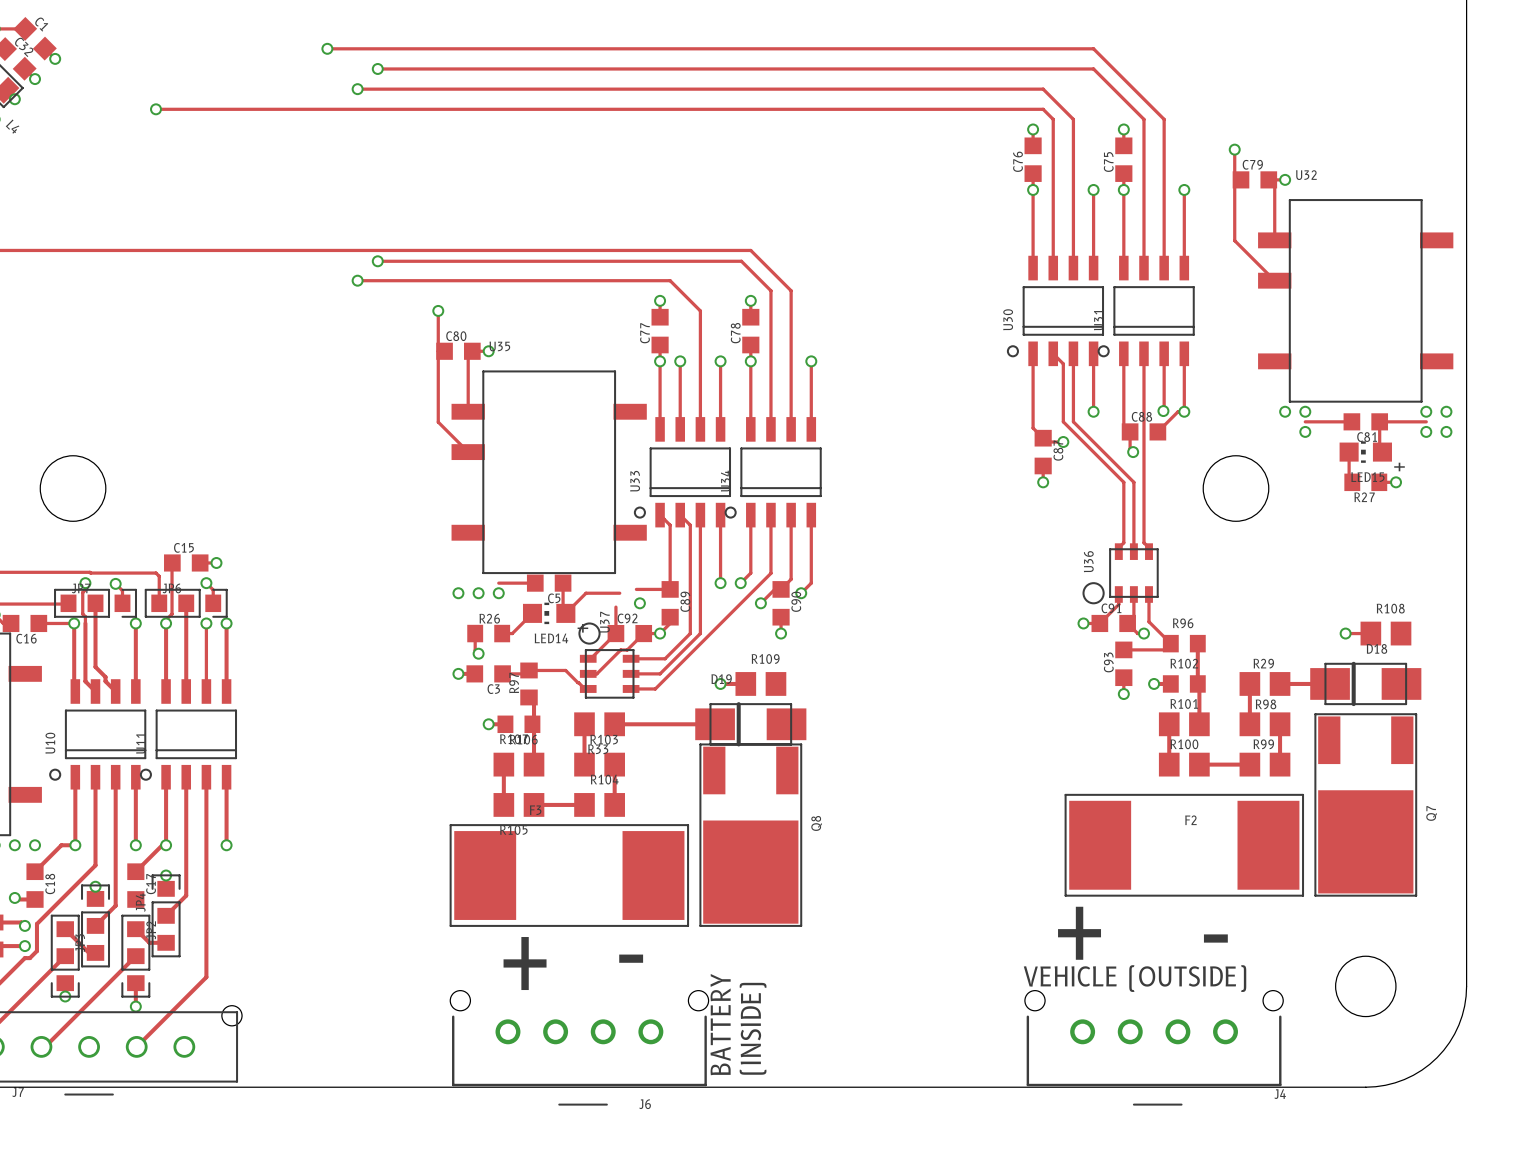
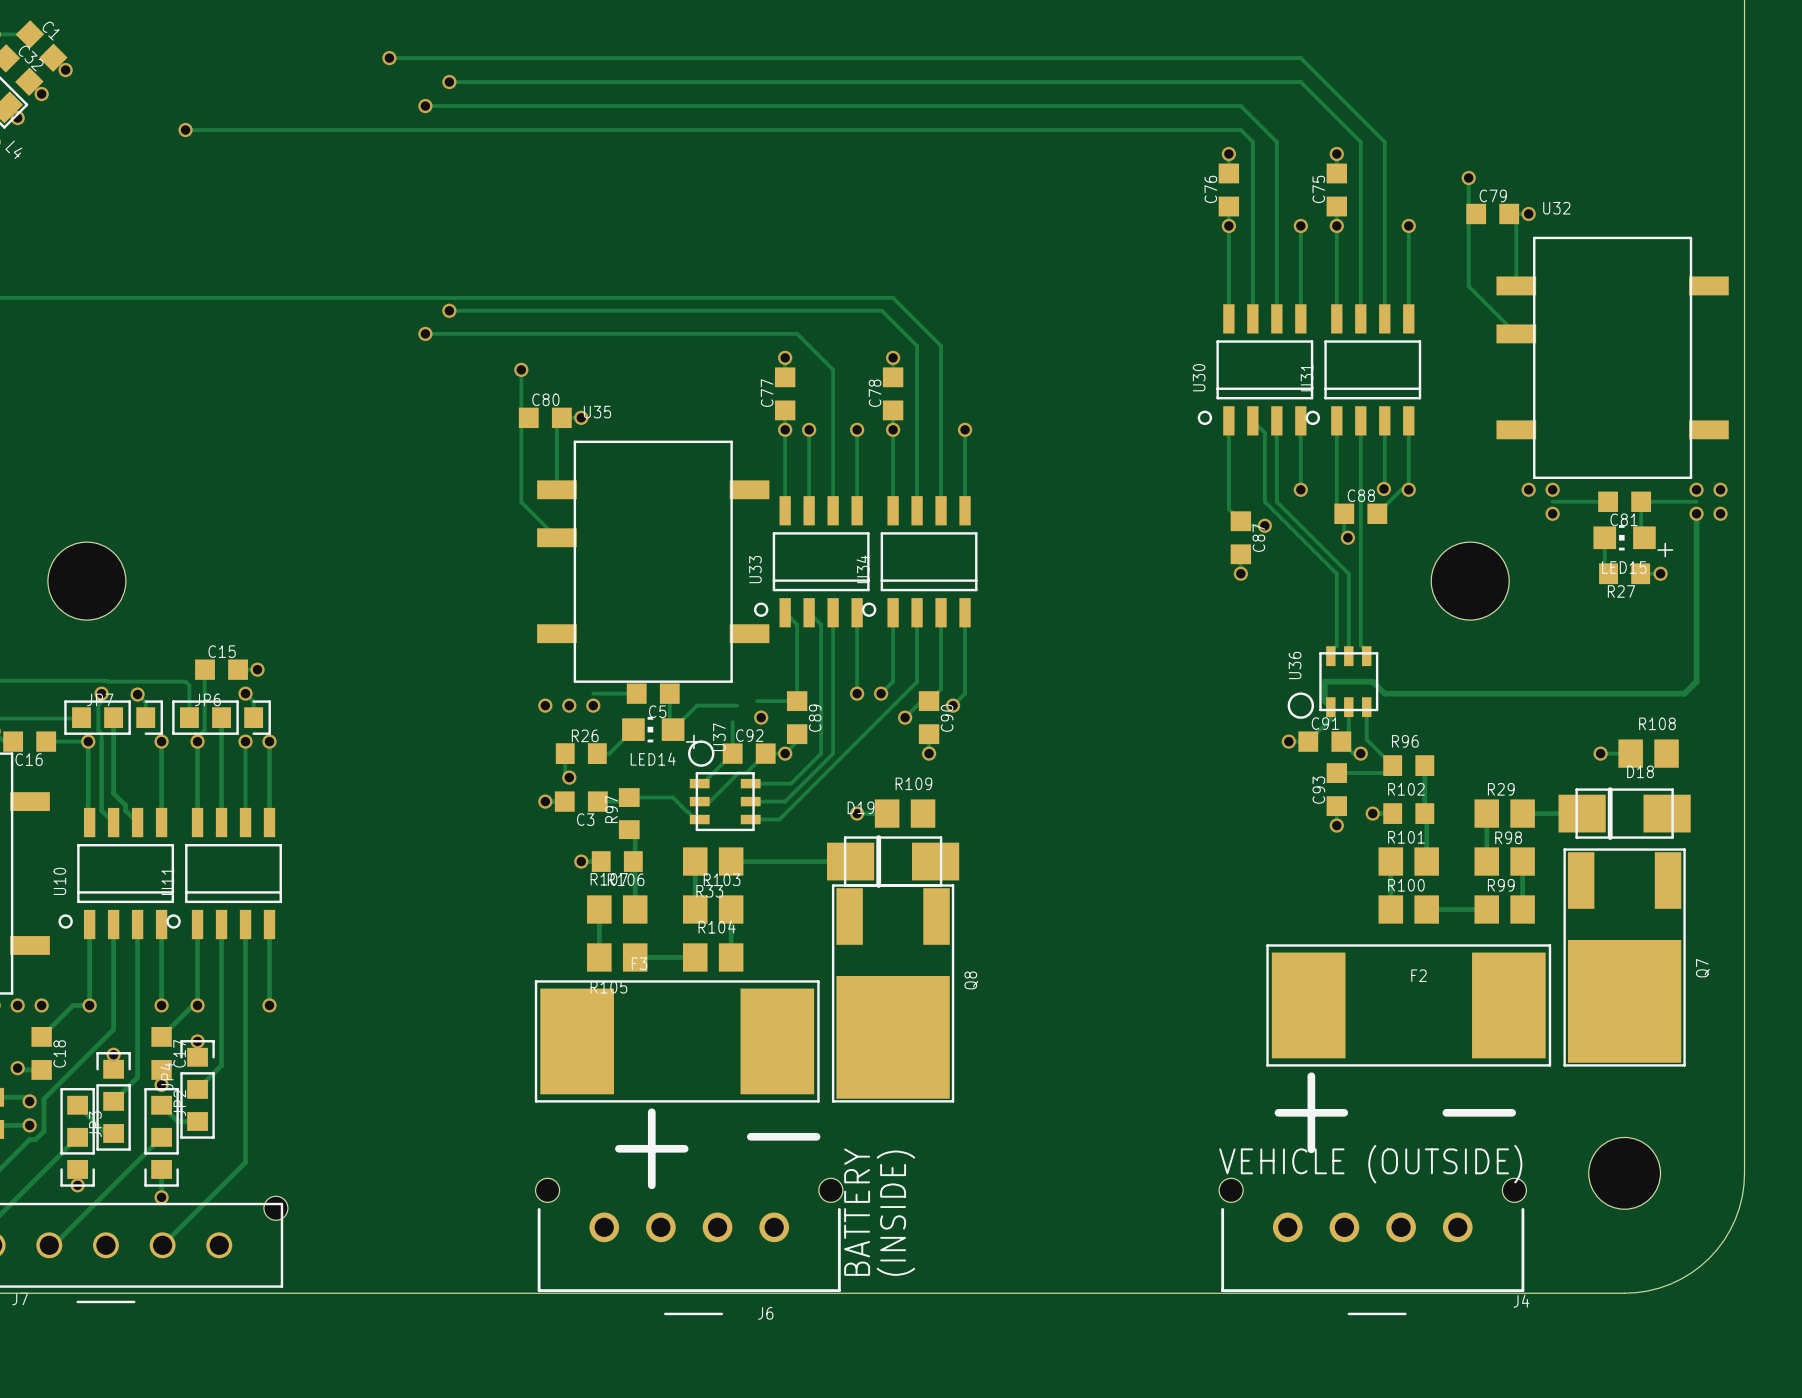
track: none -> (1696, 513) (1696, 681) (1684, 693) (1384, 693) (1372, 681) (1324, 681) (1324, 701) (1330, 707)
via: none -> (161, 1084)

